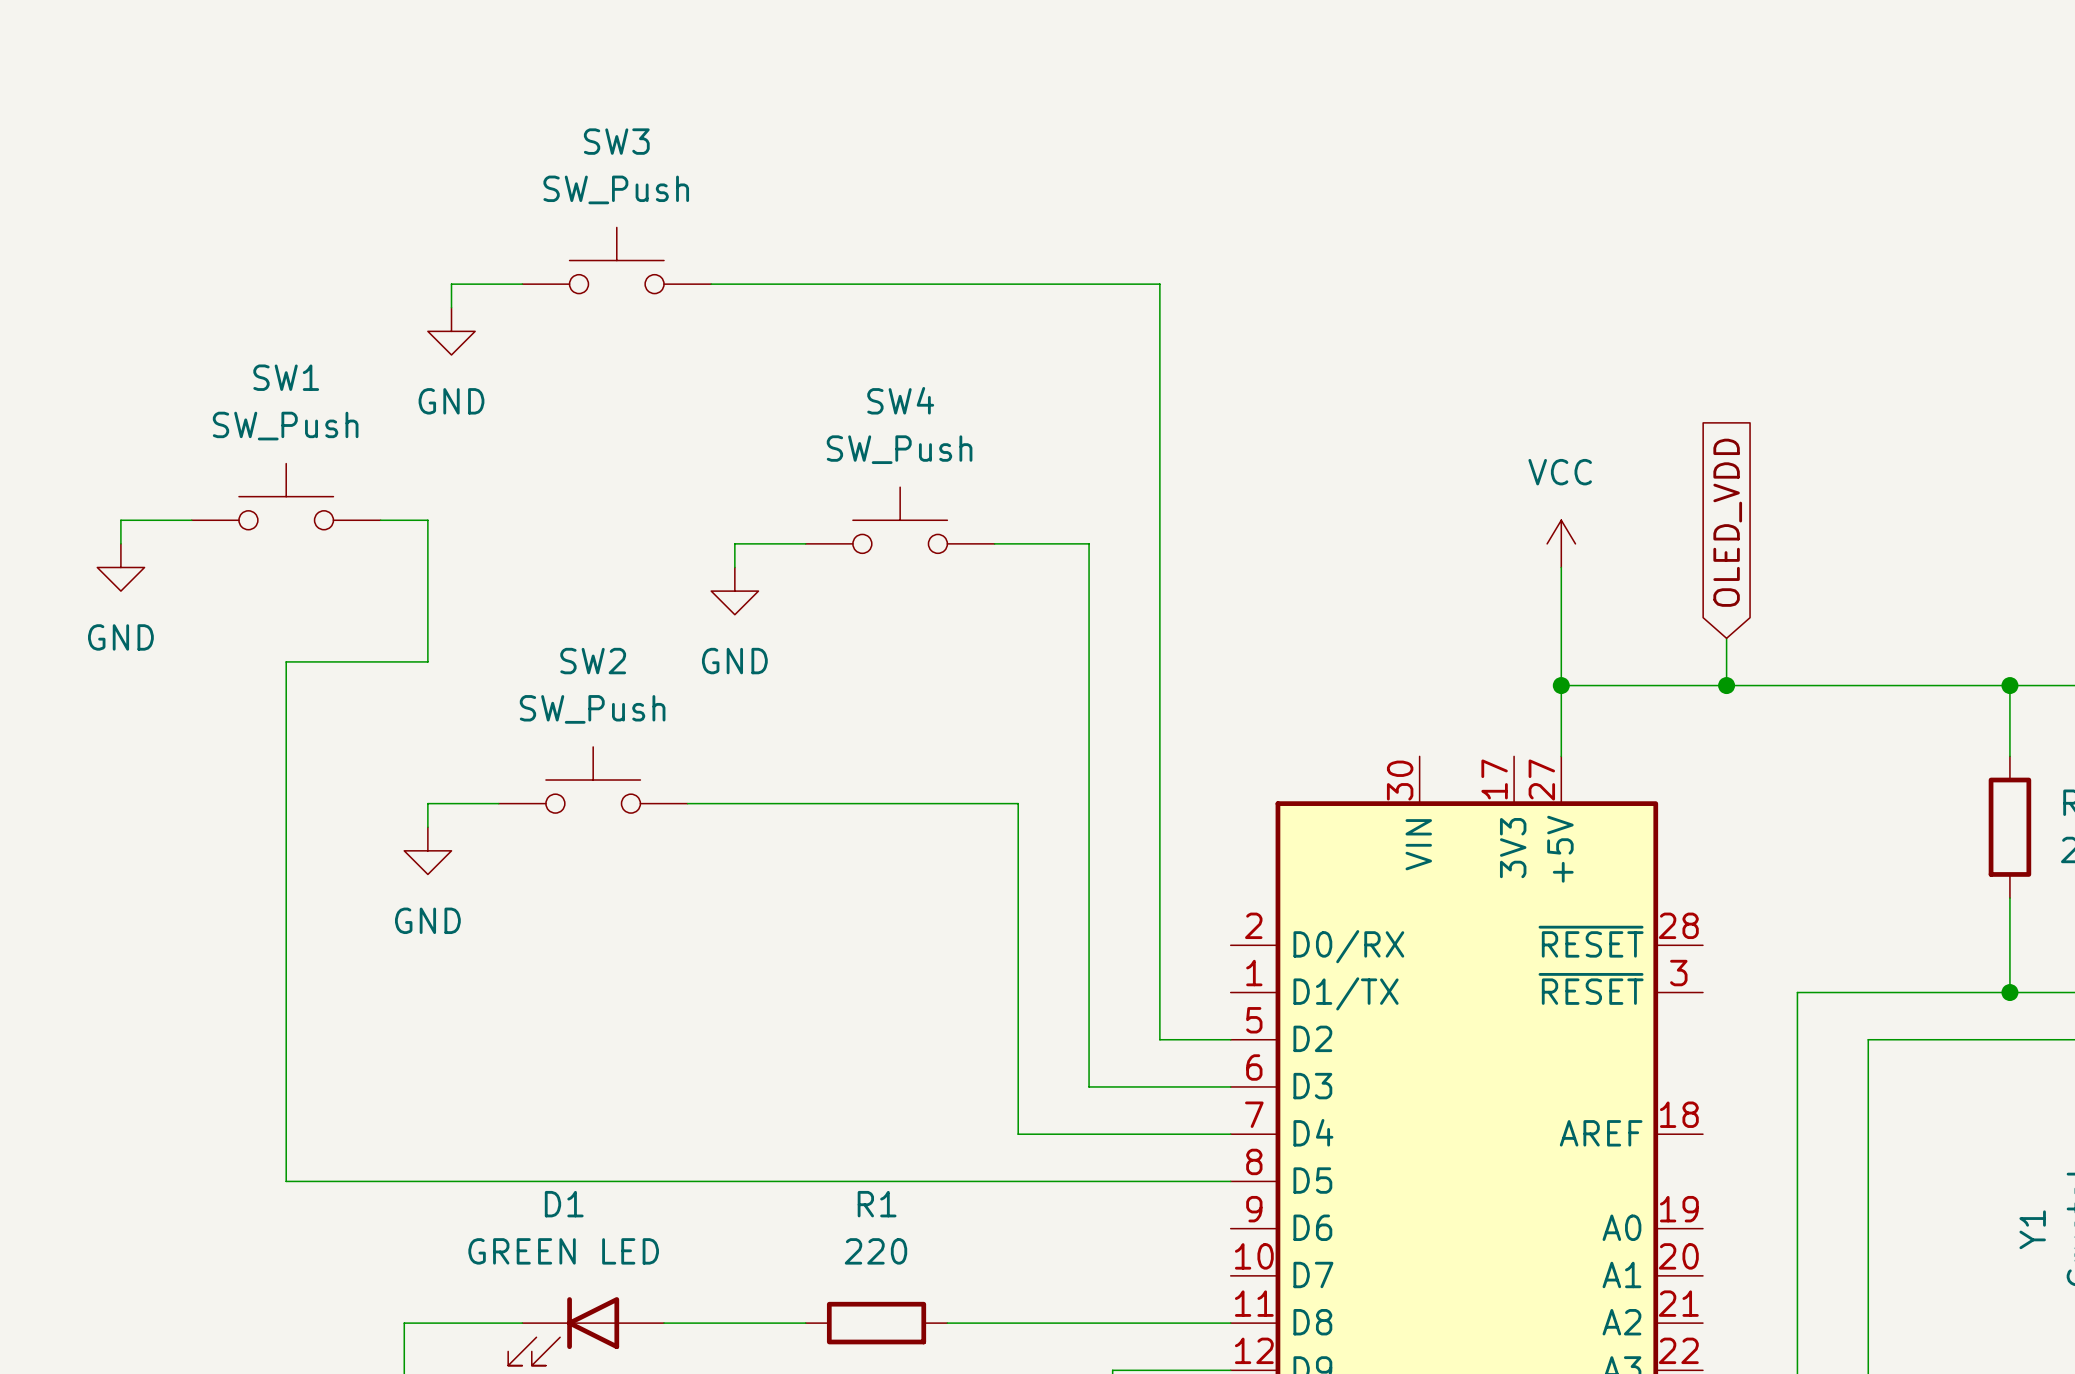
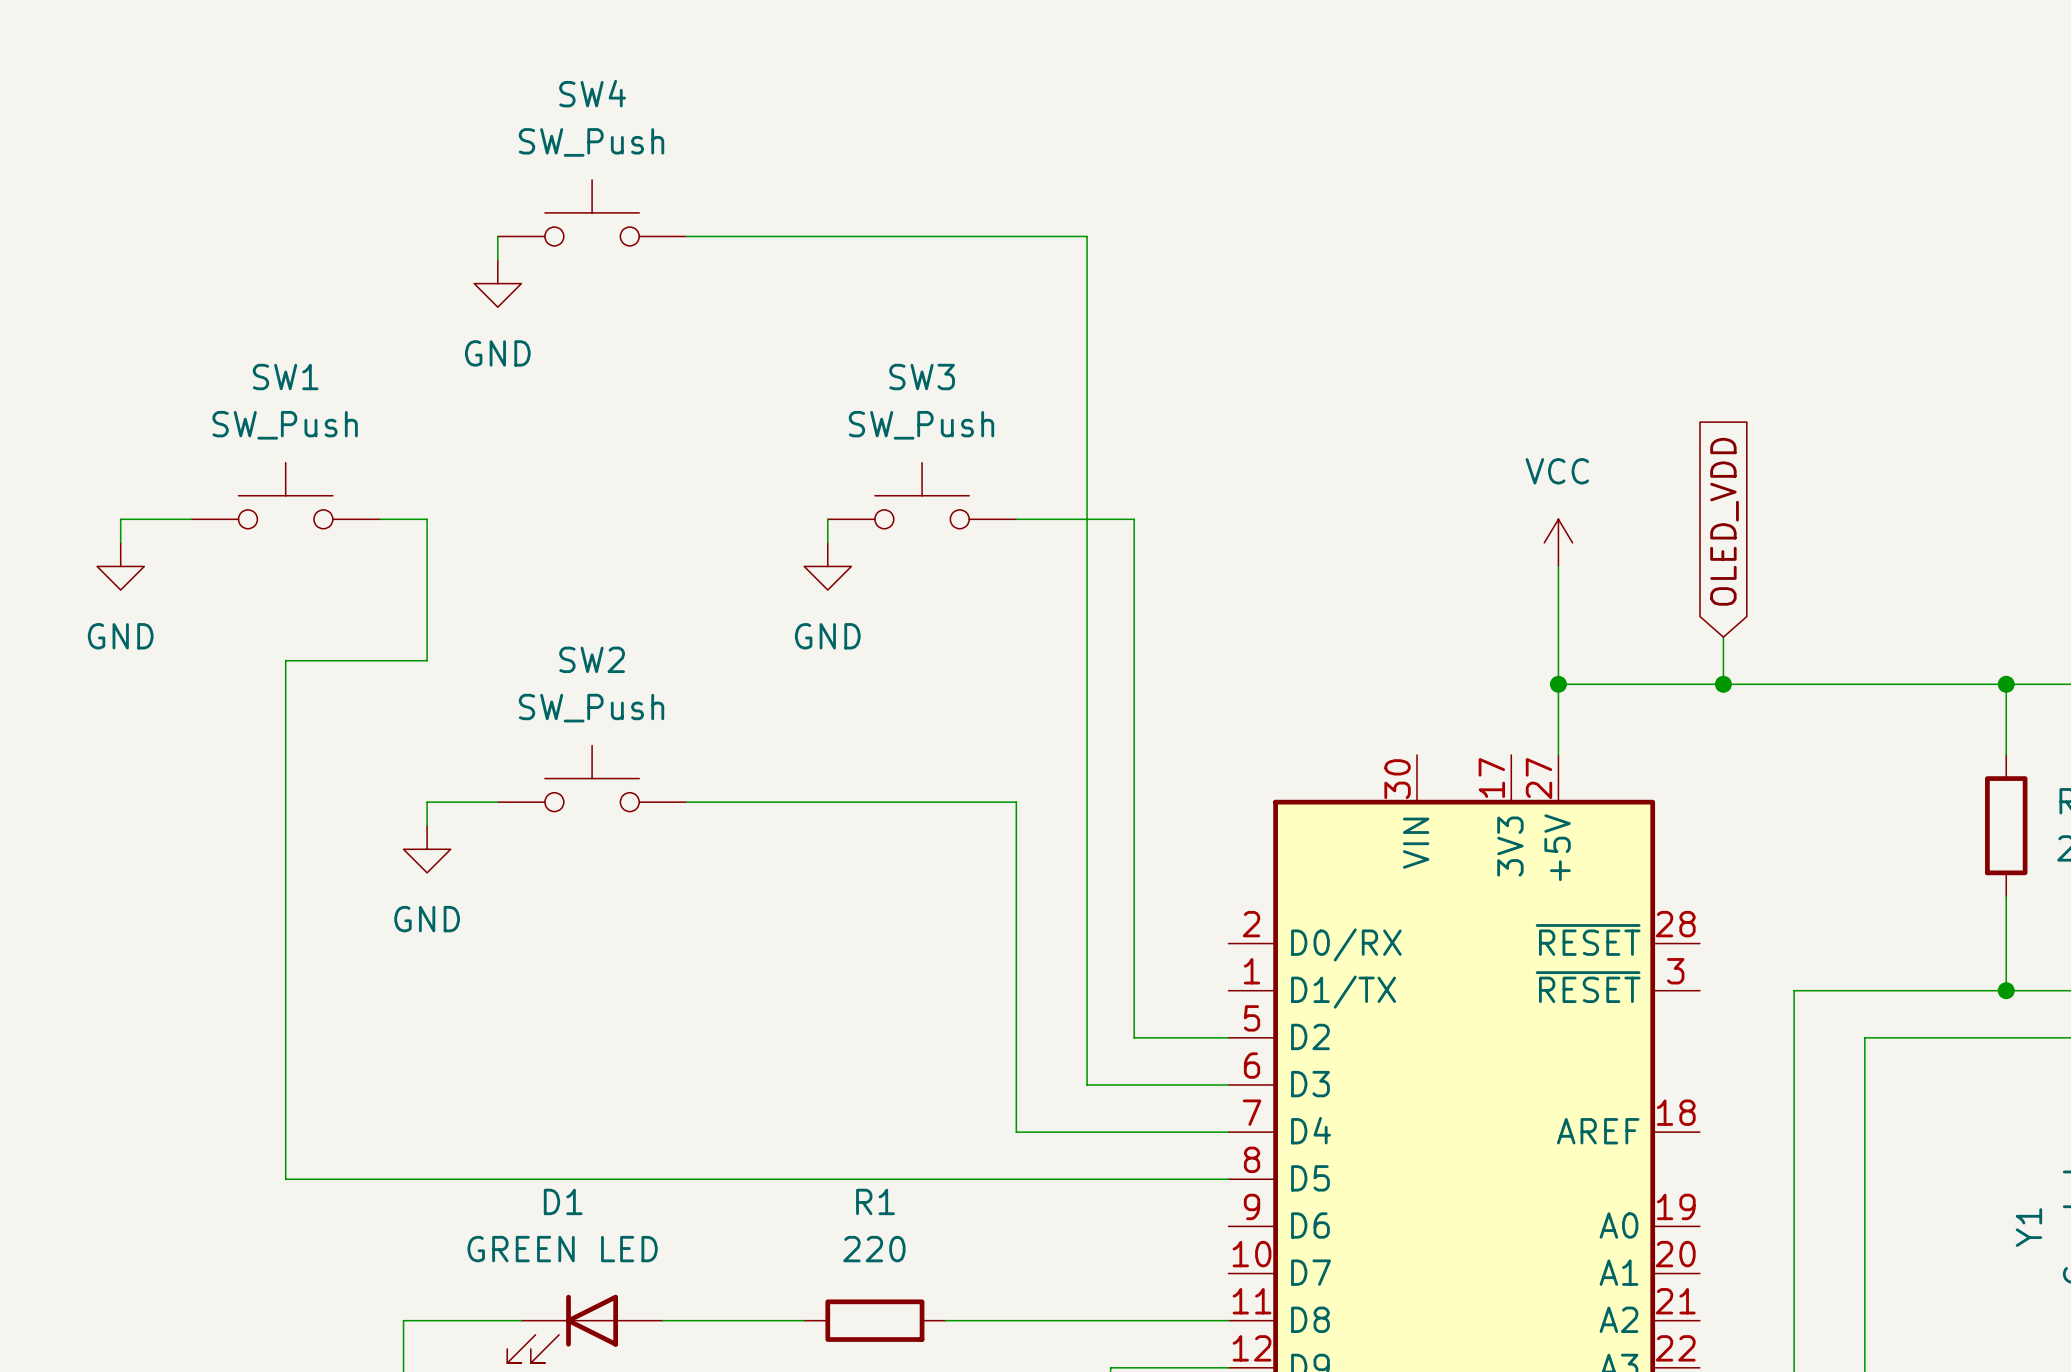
wire: none -> (497, 236) (497, 260)
SW3 position: (616, 260) -> (922, 495)
wire: (522, 284) (451, 284) (451, 307) -> none
wire: (711, 284) (1159, 284) (1159, 1039) -> (1016, 519) (1134, 519) (1134, 1037) (1157, 1037)
power symbol position: GND (451, 331) -> GND (497, 283)
wire: none -> (827, 519) (827, 542)
SW4 position: (900, 520) -> (592, 212)
wire: (805, 543) (734, 543) (734, 567) -> none
wire: (994, 543) (1089, 543) -> (686, 236) (1087, 236) (1087, 542)
power symbol position: GND (734, 591) -> GND (827, 566)

